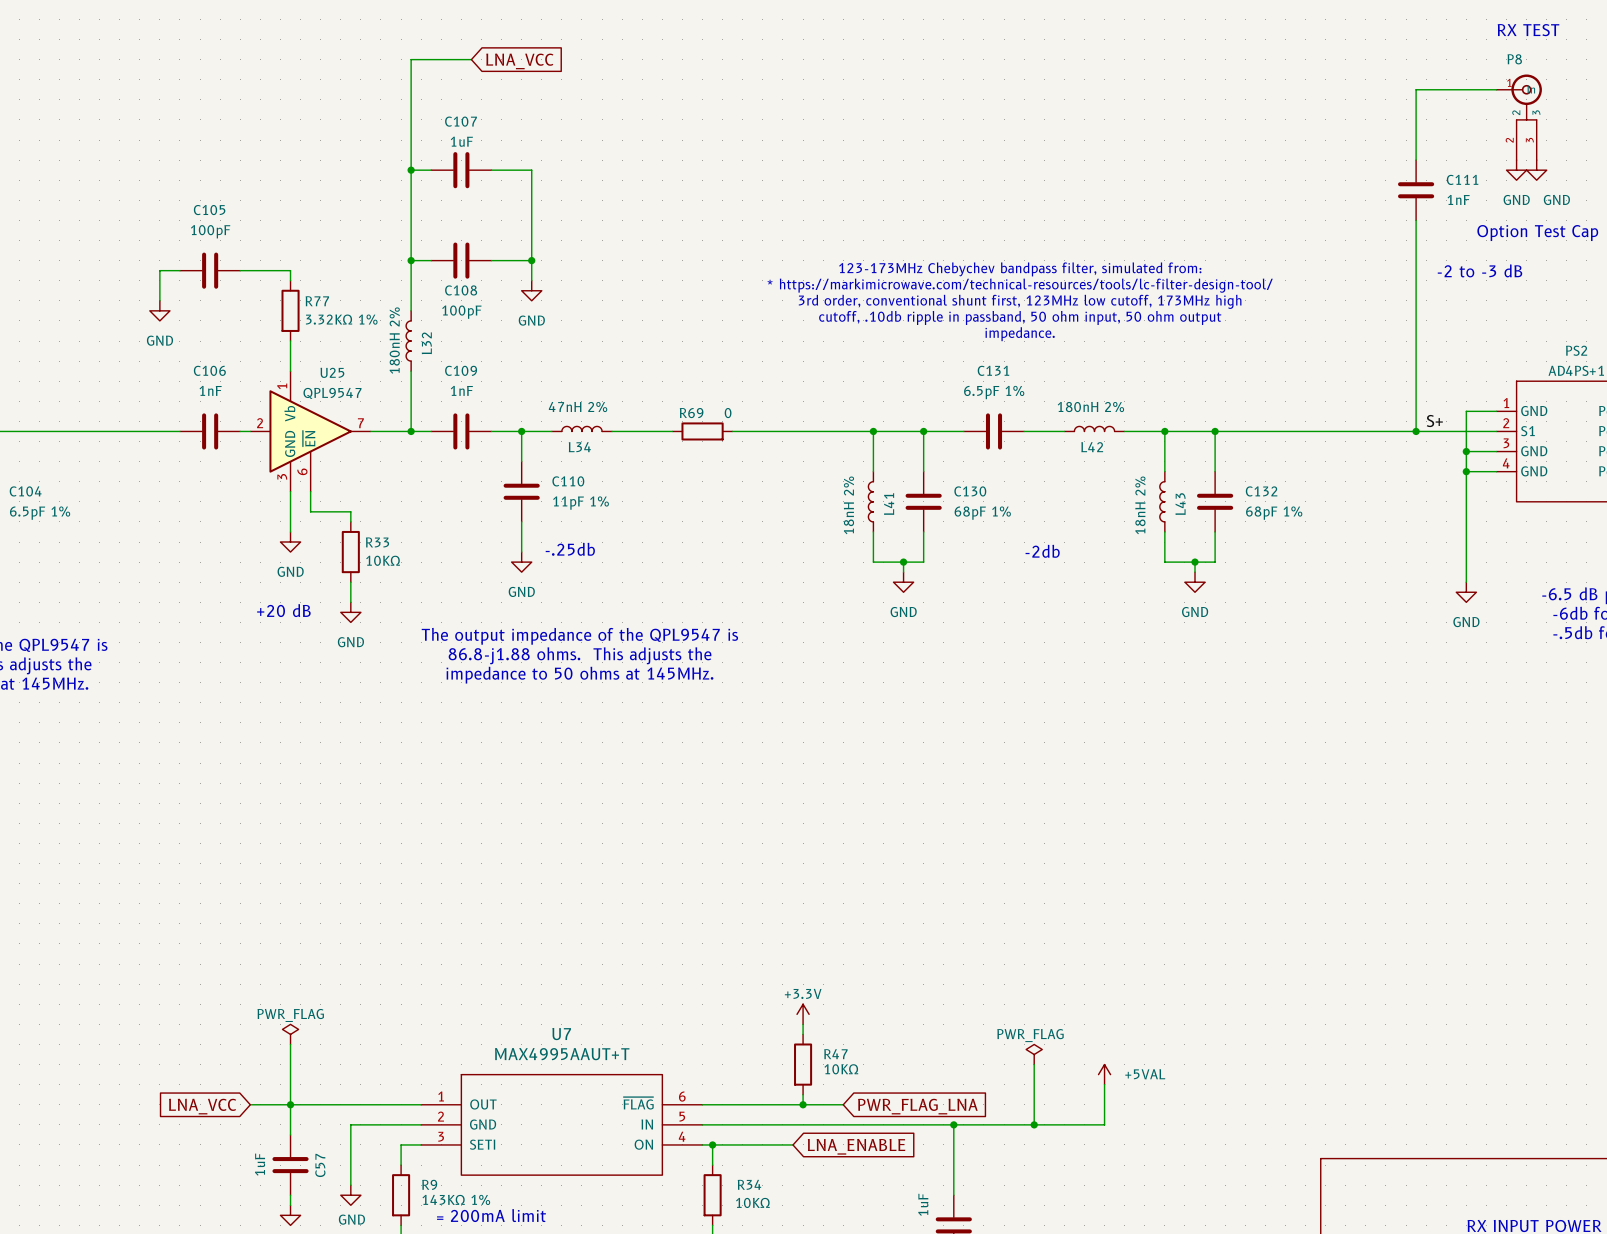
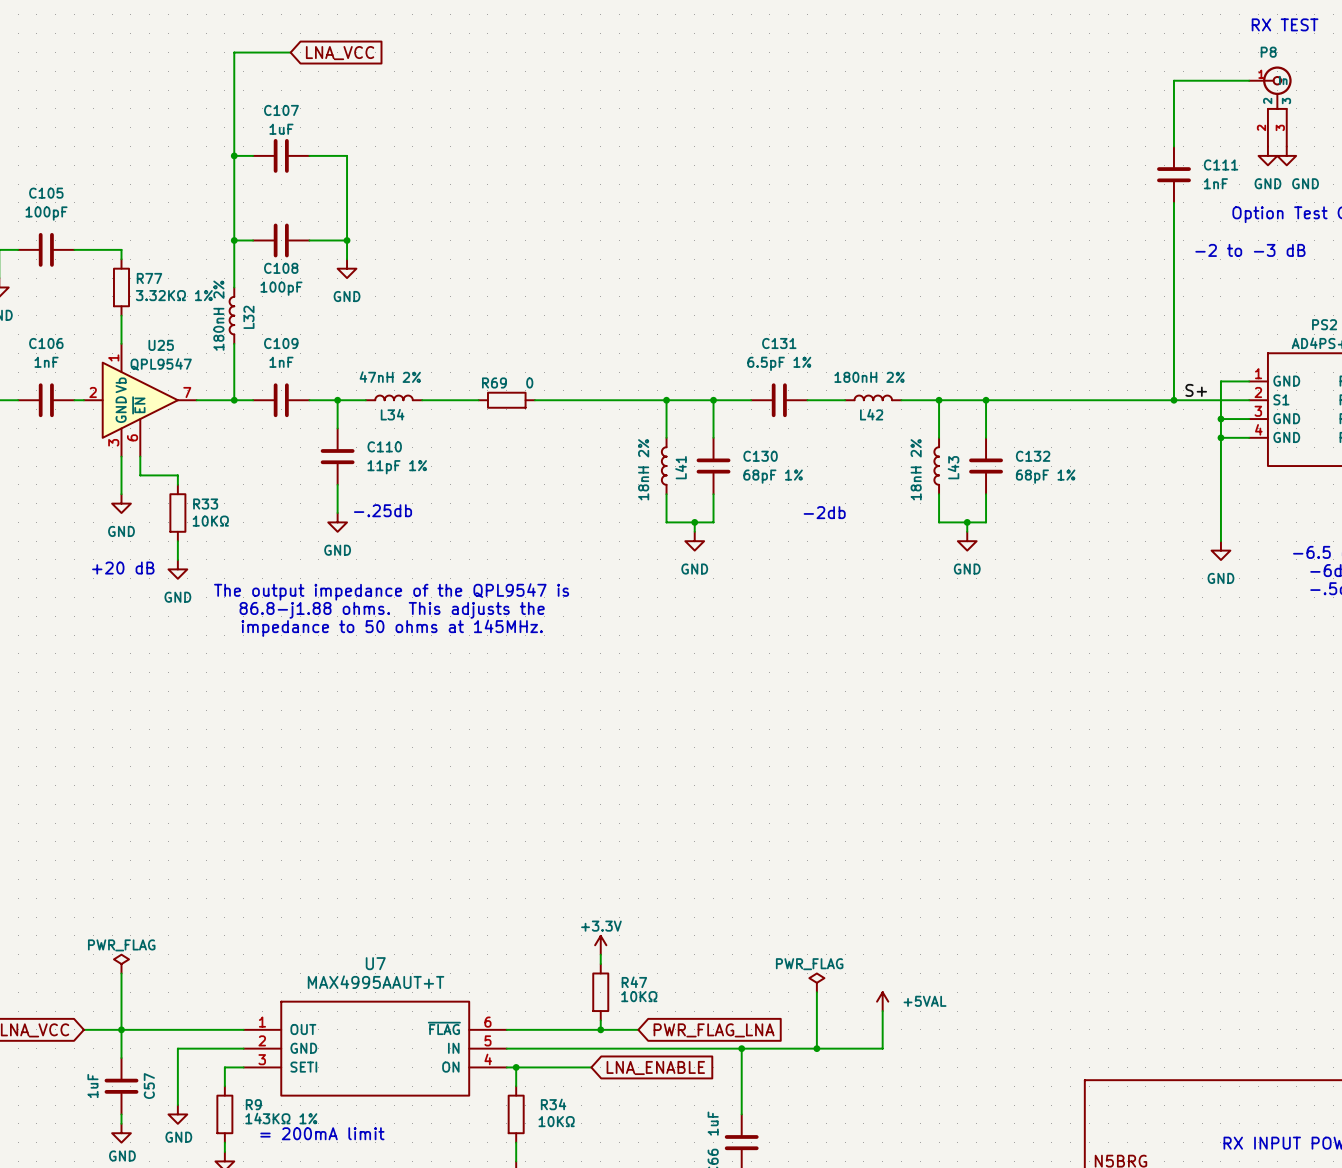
text: 123-173MHz Chebychev bandpass filter, simulated from: (1020, 269) -> none
text: * https://markimicrowave.com/technical-resources/tools/lc-filter-design-tool/ (1020, 285) -> none
text: 3rd order, conventional shunt first, 123MHz low cutoff, 173MHz high (1020, 301) -> none
text: cutoff, .10db ripple in passband, 50 ohm input, 50 ohm output (1020, 317) -> none
text: impedance. (1020, 334) -> none

